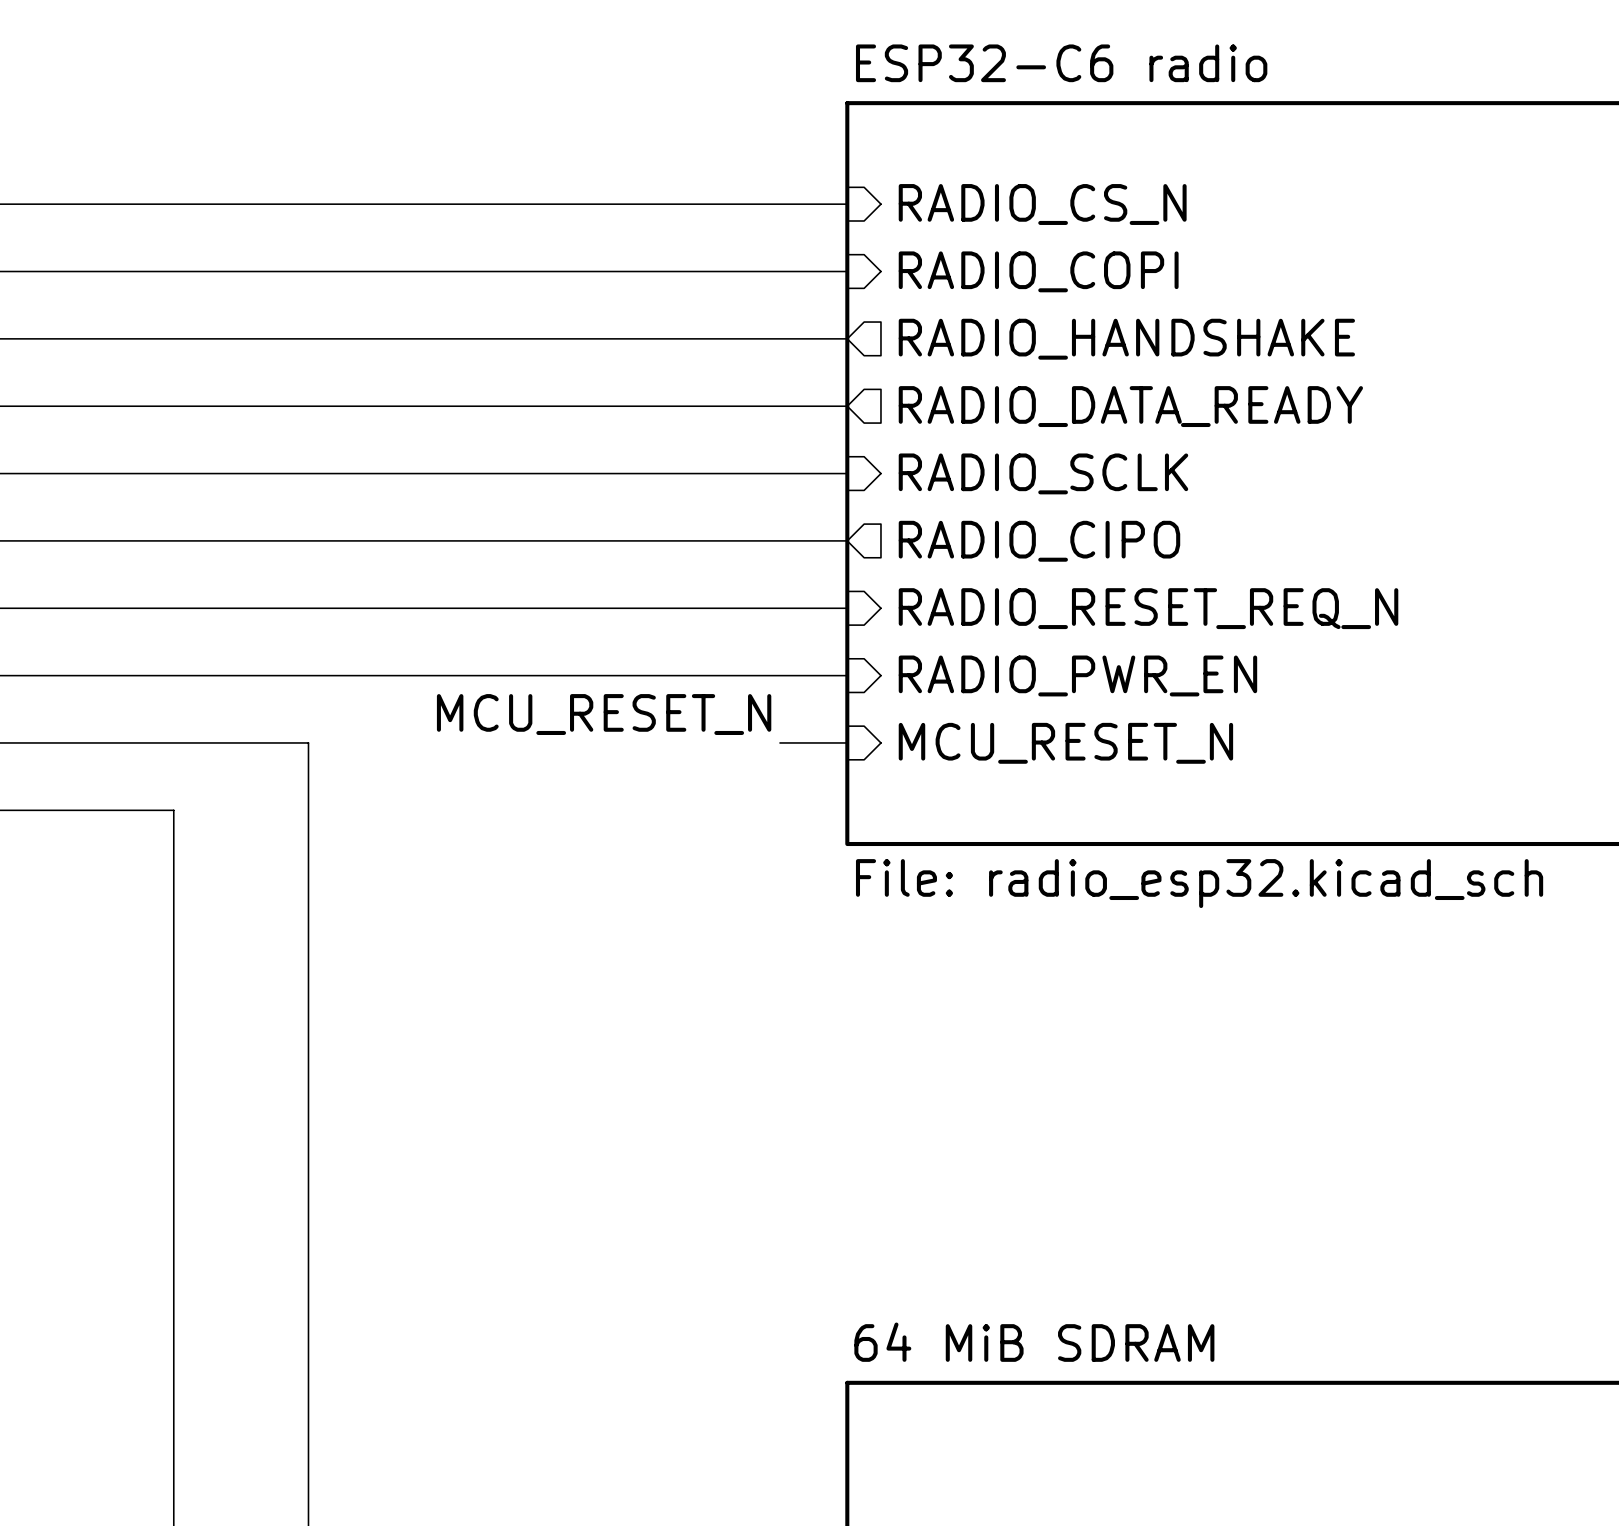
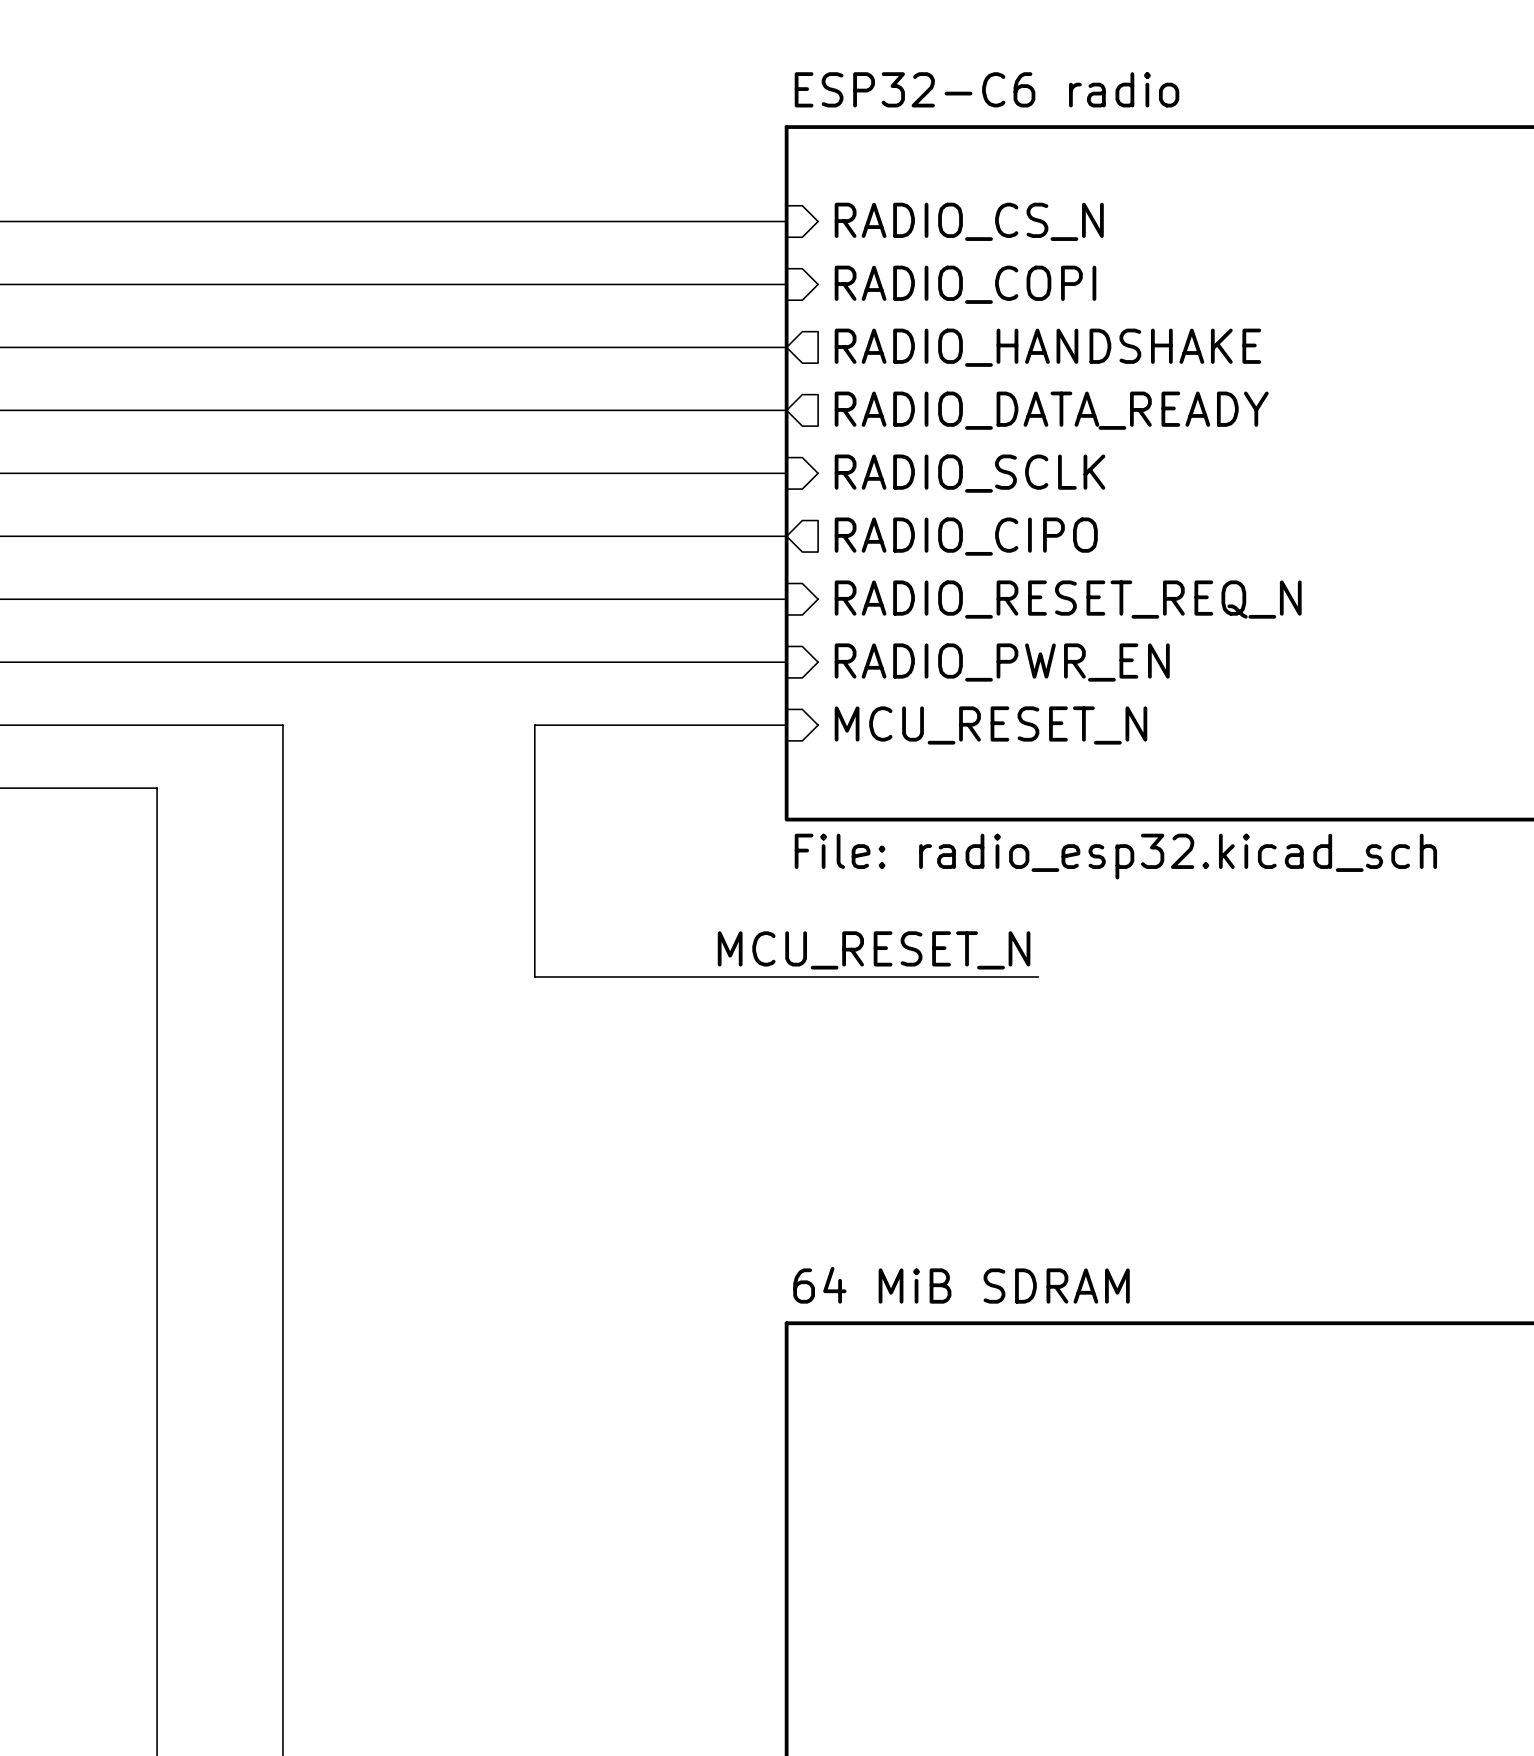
label position: MCU_RESET_N (604, 714) -> MCU_RESET_N (874, 950)
wire: none -> (723, 725) (534, 725) (534, 976) (1038, 976)

